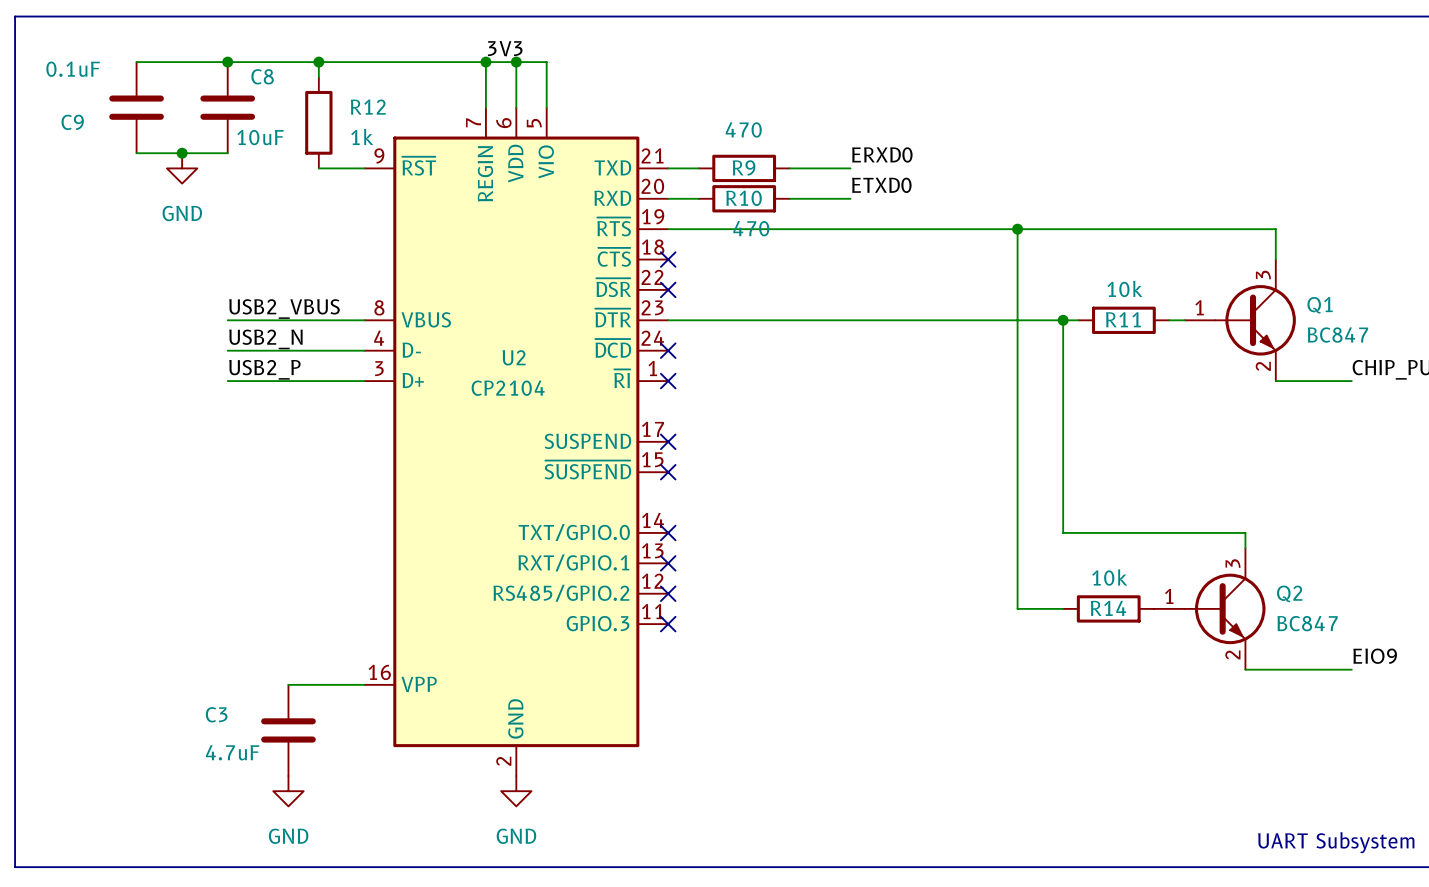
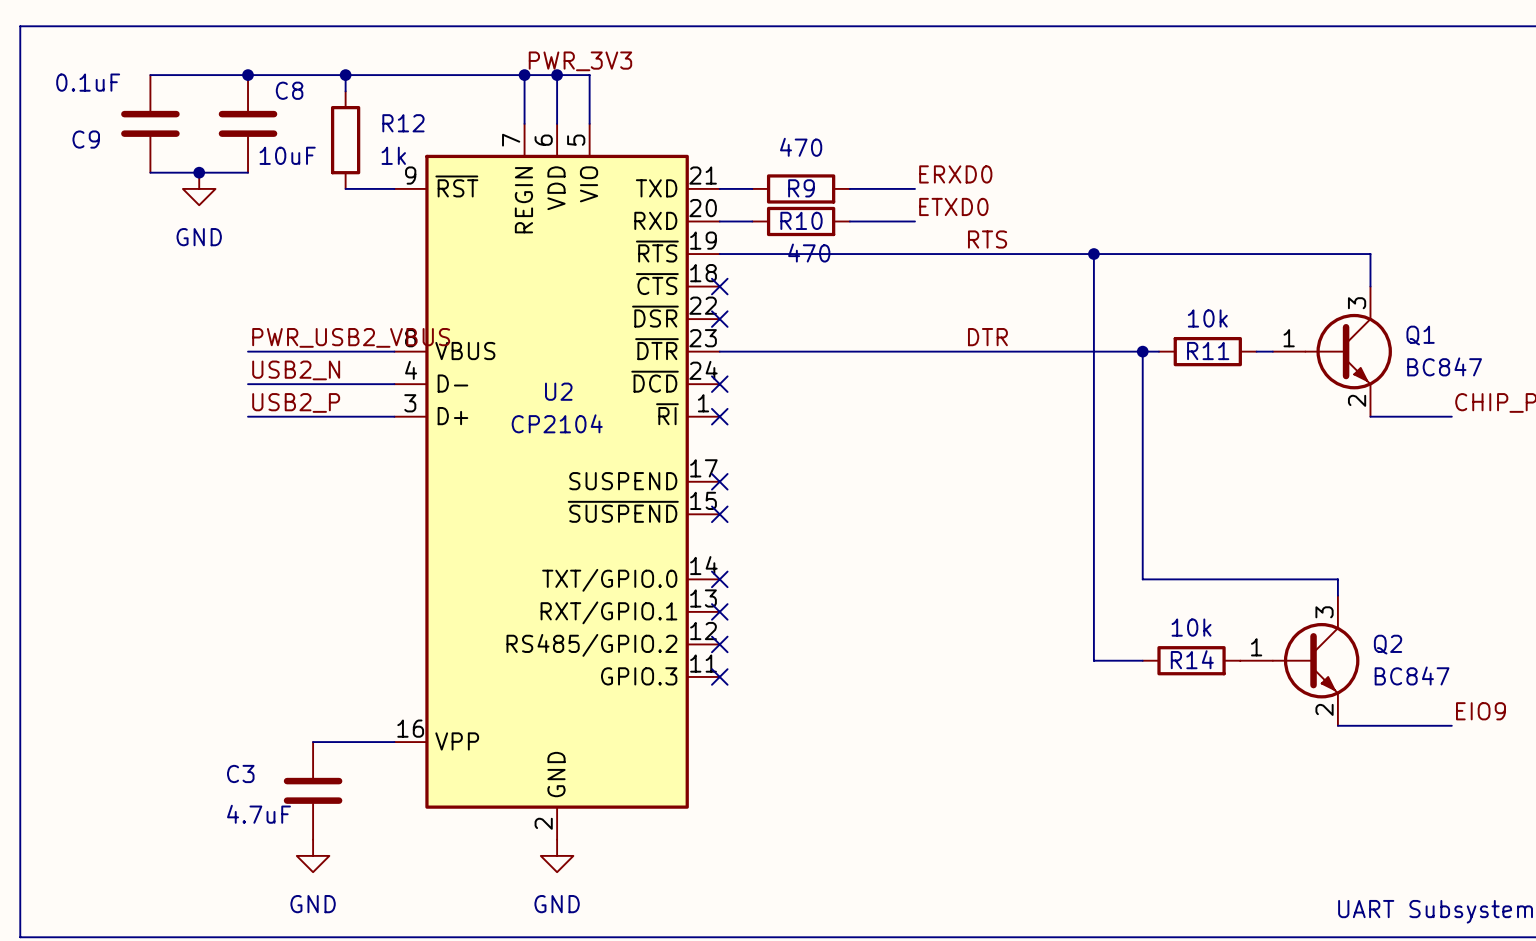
label: 3V3 (505, 48) -> PWR_3V3 (580, 61)
label: none -> RTS (987, 239)
label: none -> DTR (987, 337)
label: USB2_VBUS (284, 309) -> PWR_USB2_VBUS (351, 337)

